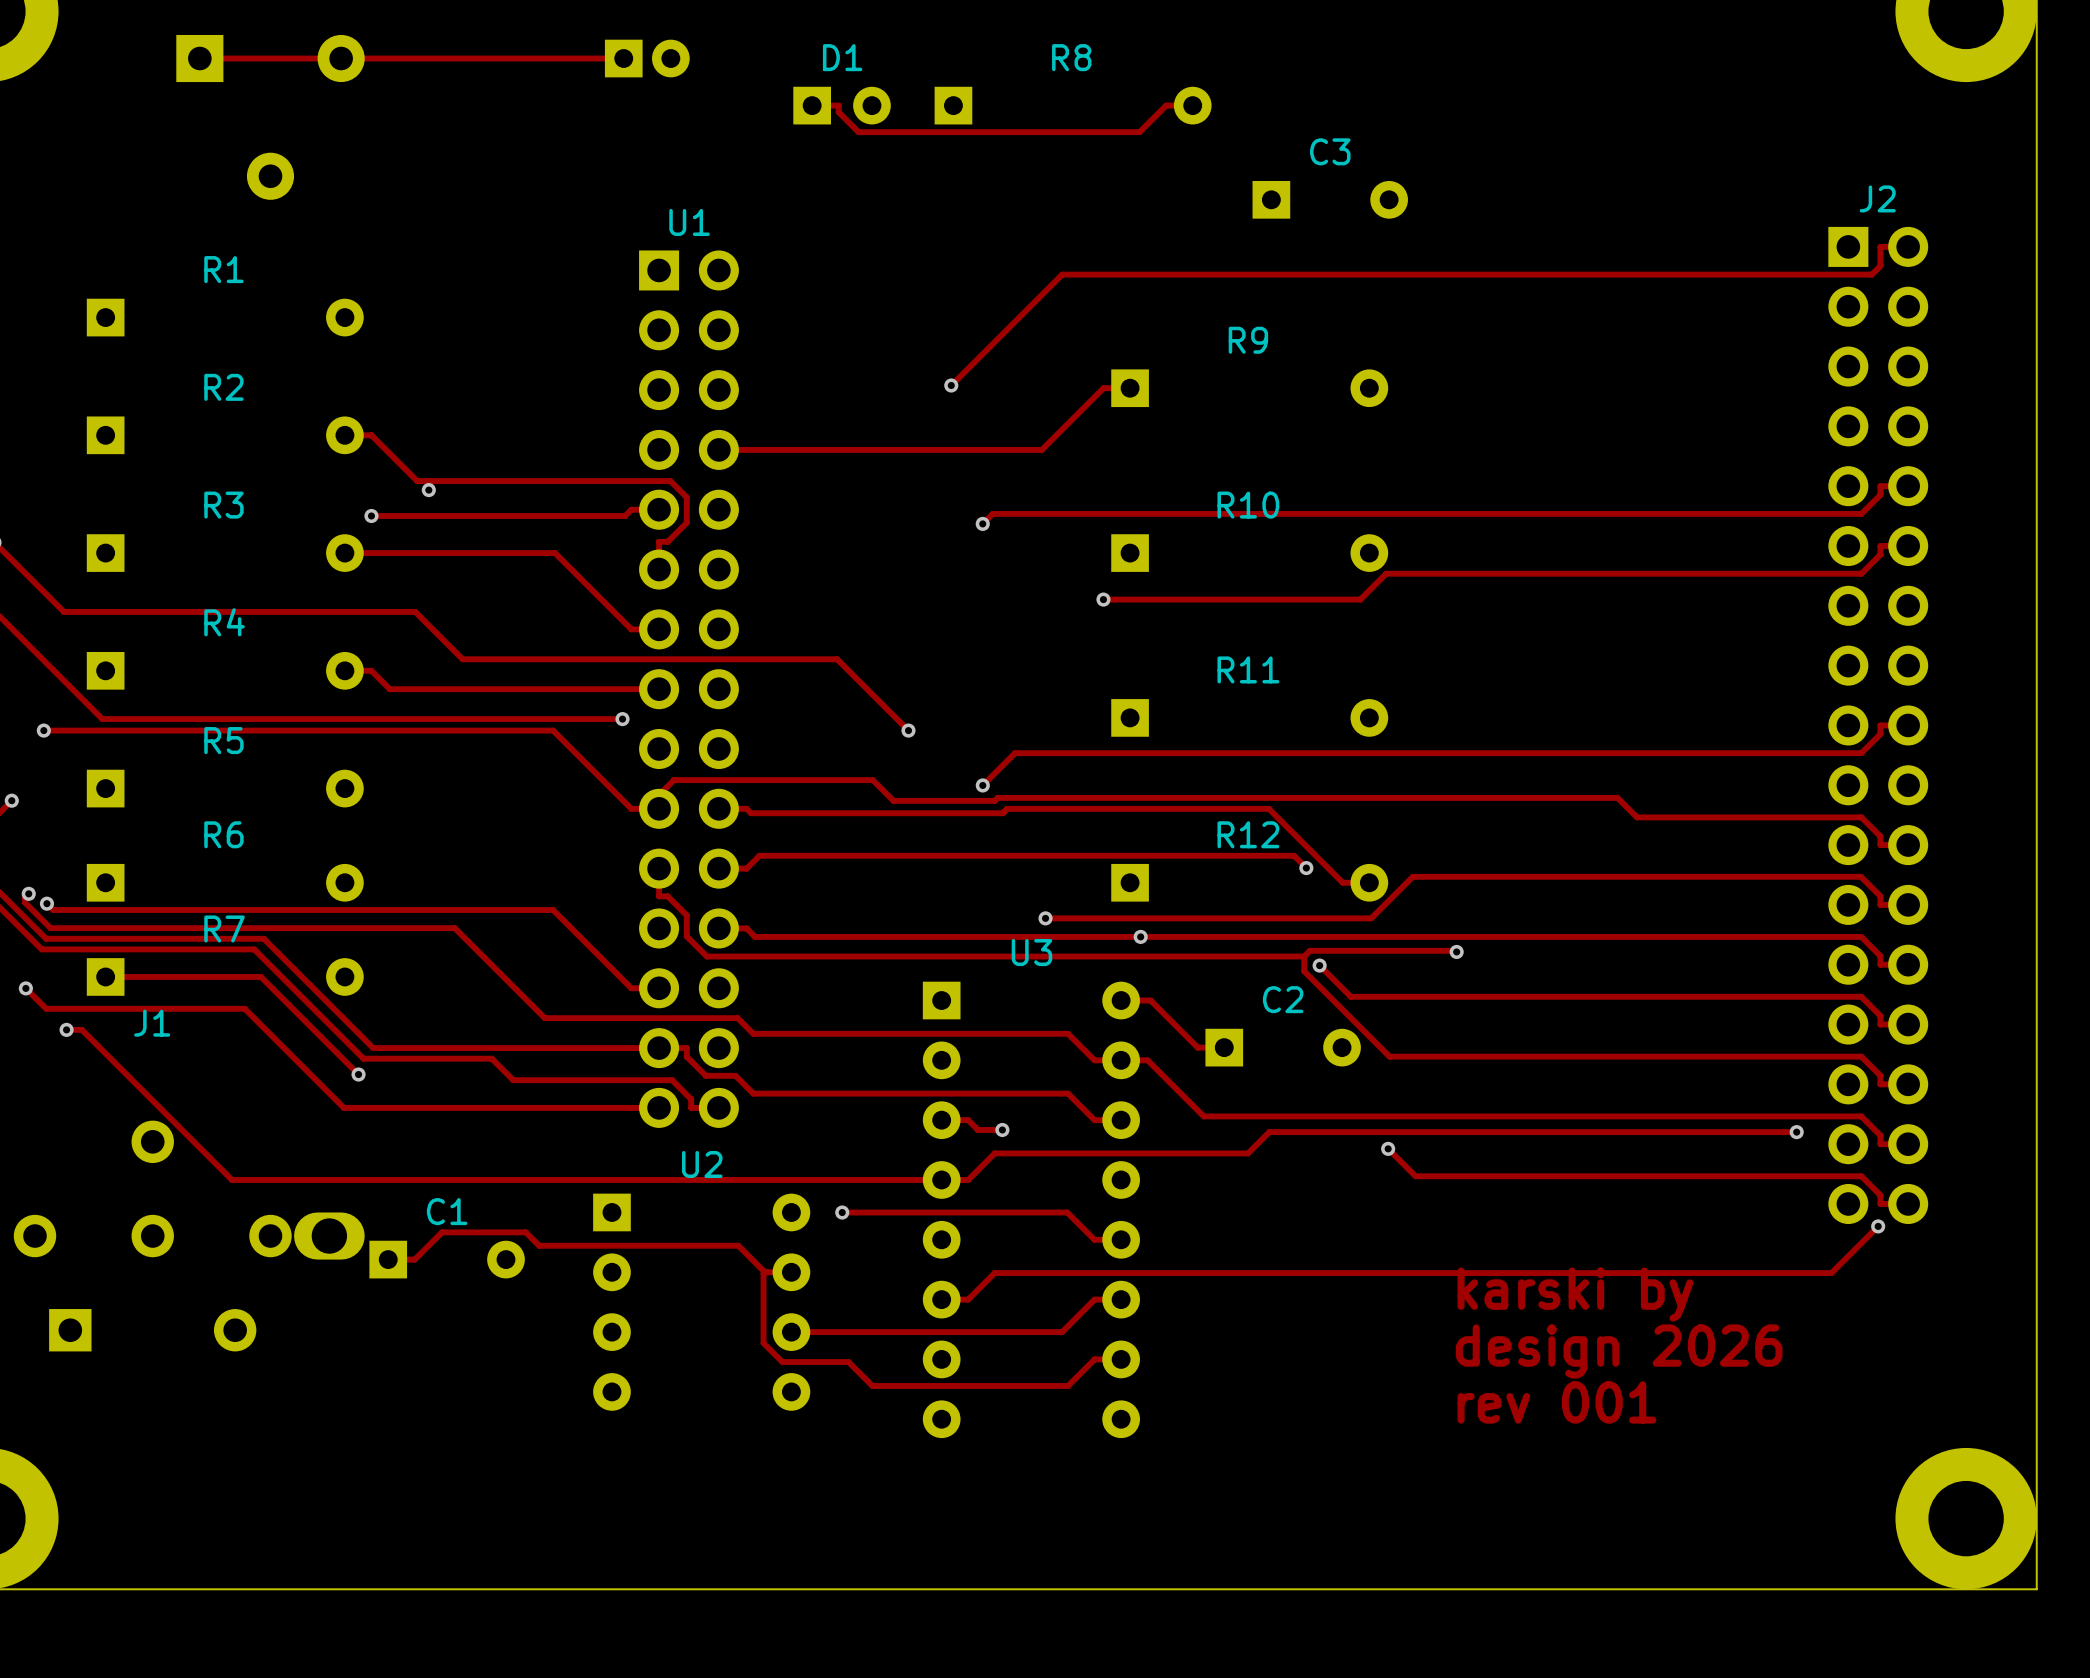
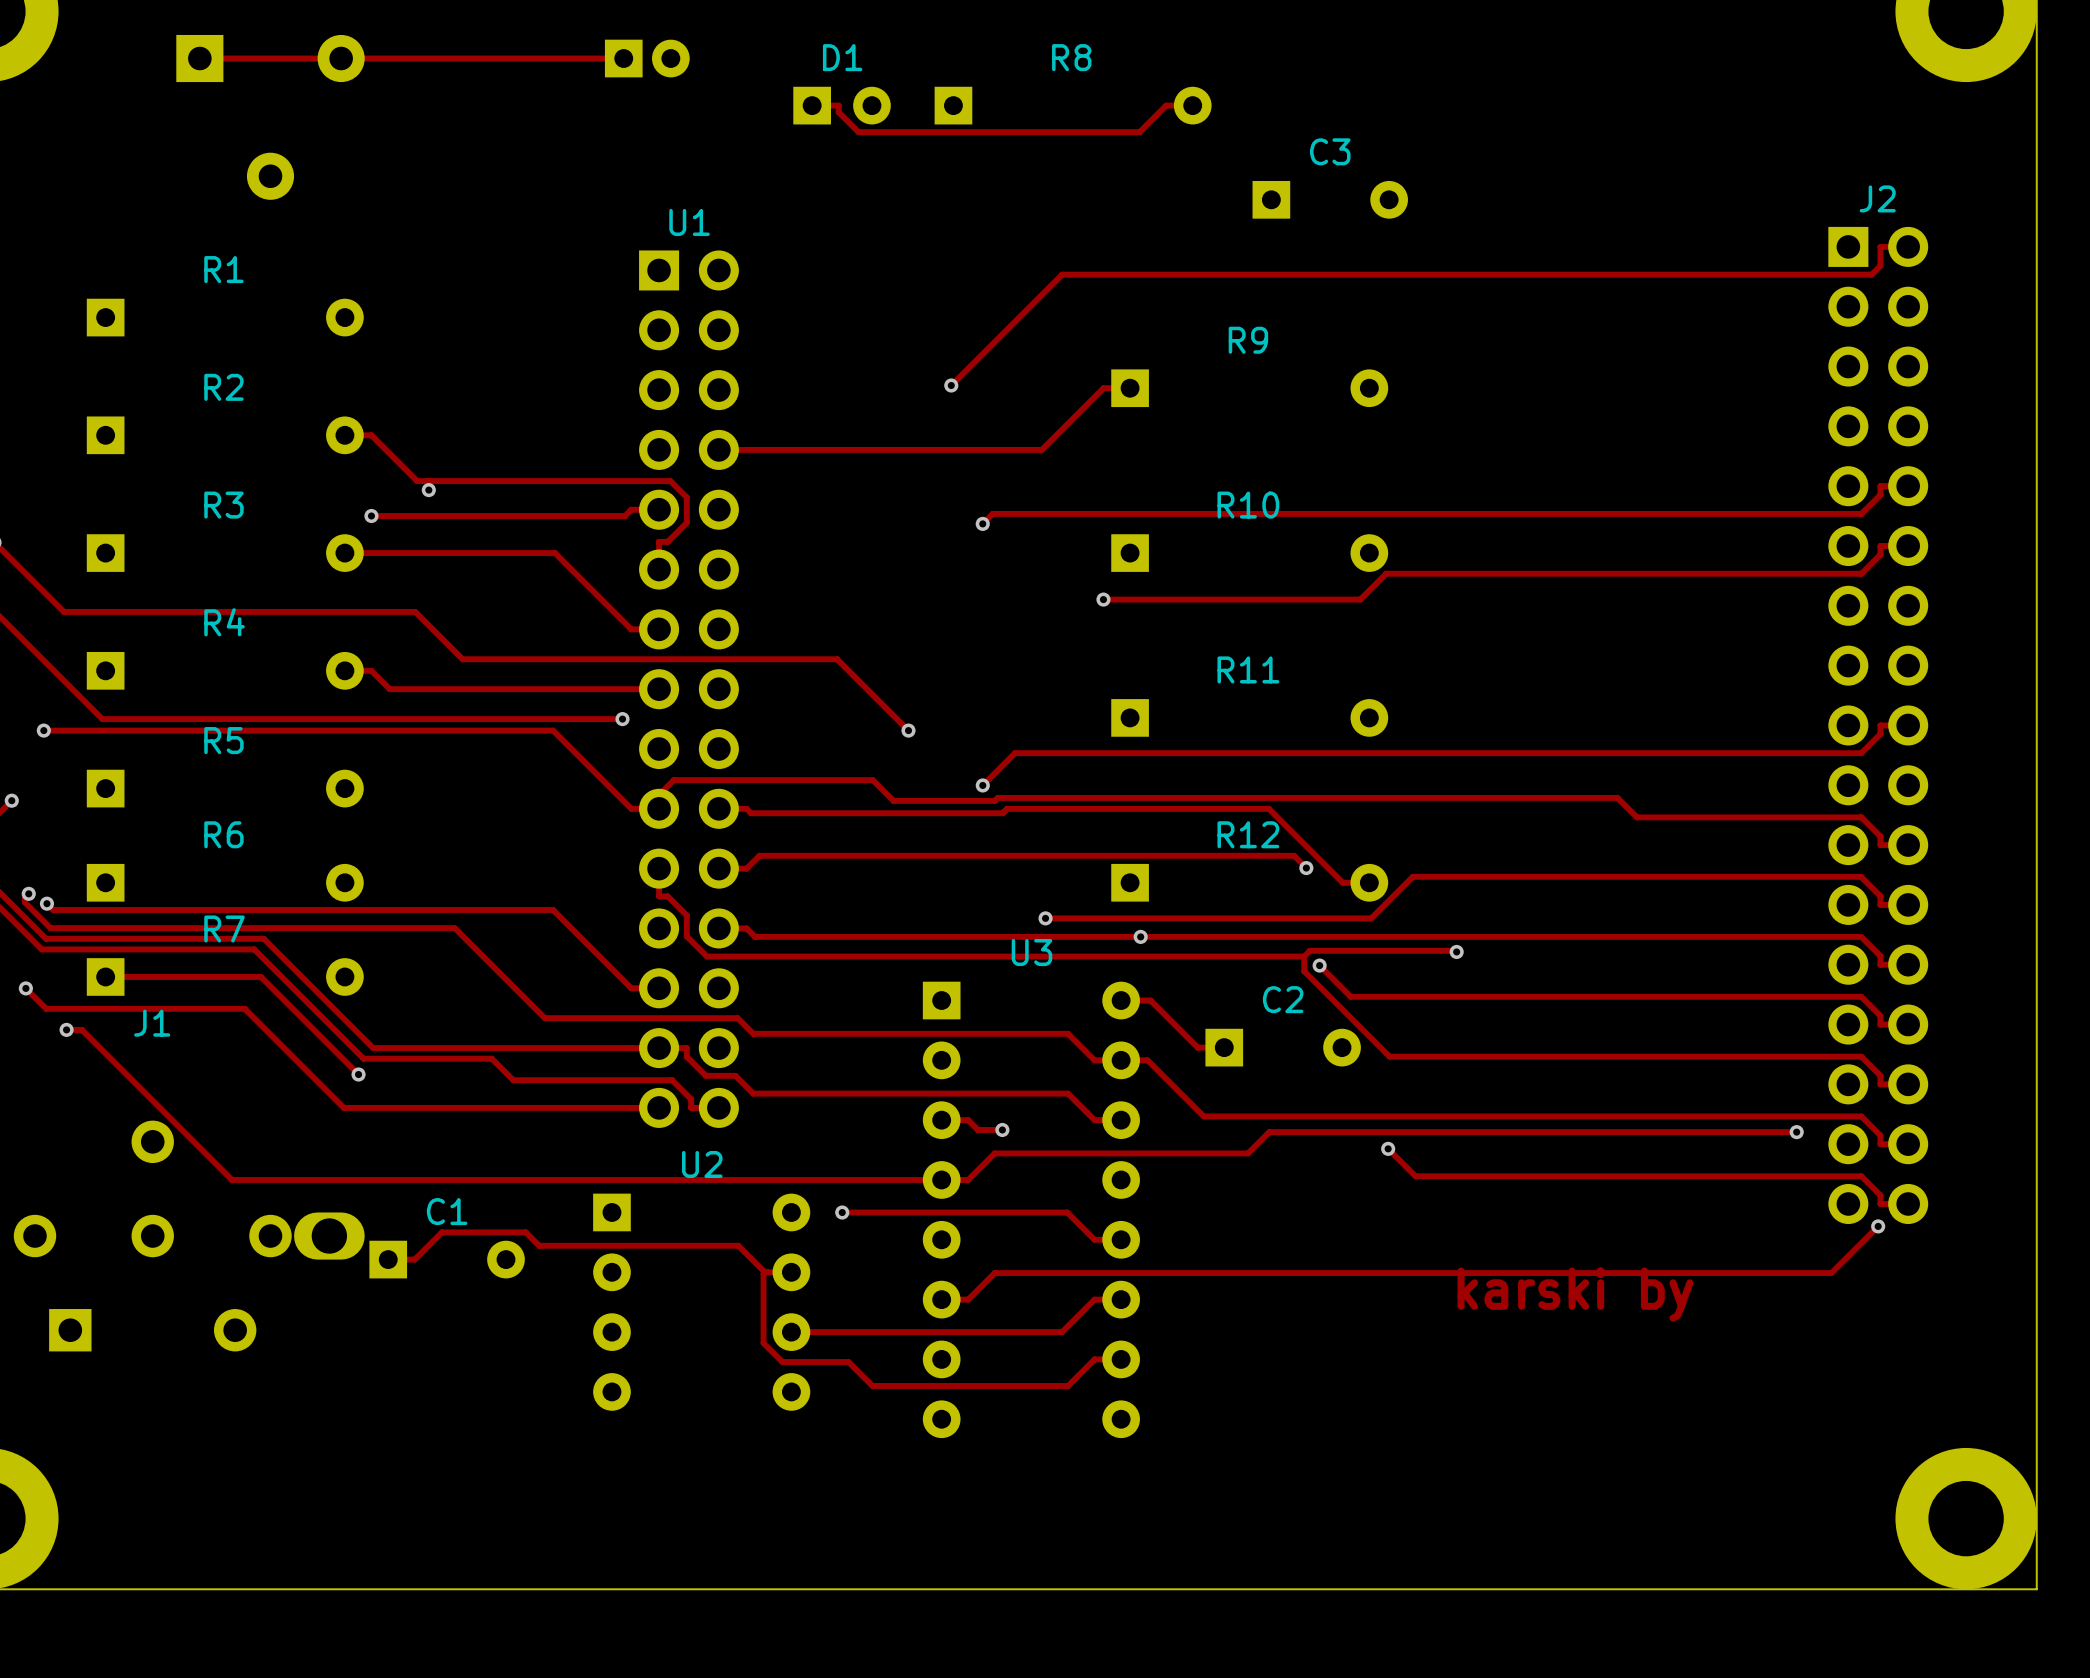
text: design 2026 (1619, 1351) -> none
text: rev 001 (1556, 1402) -> none

